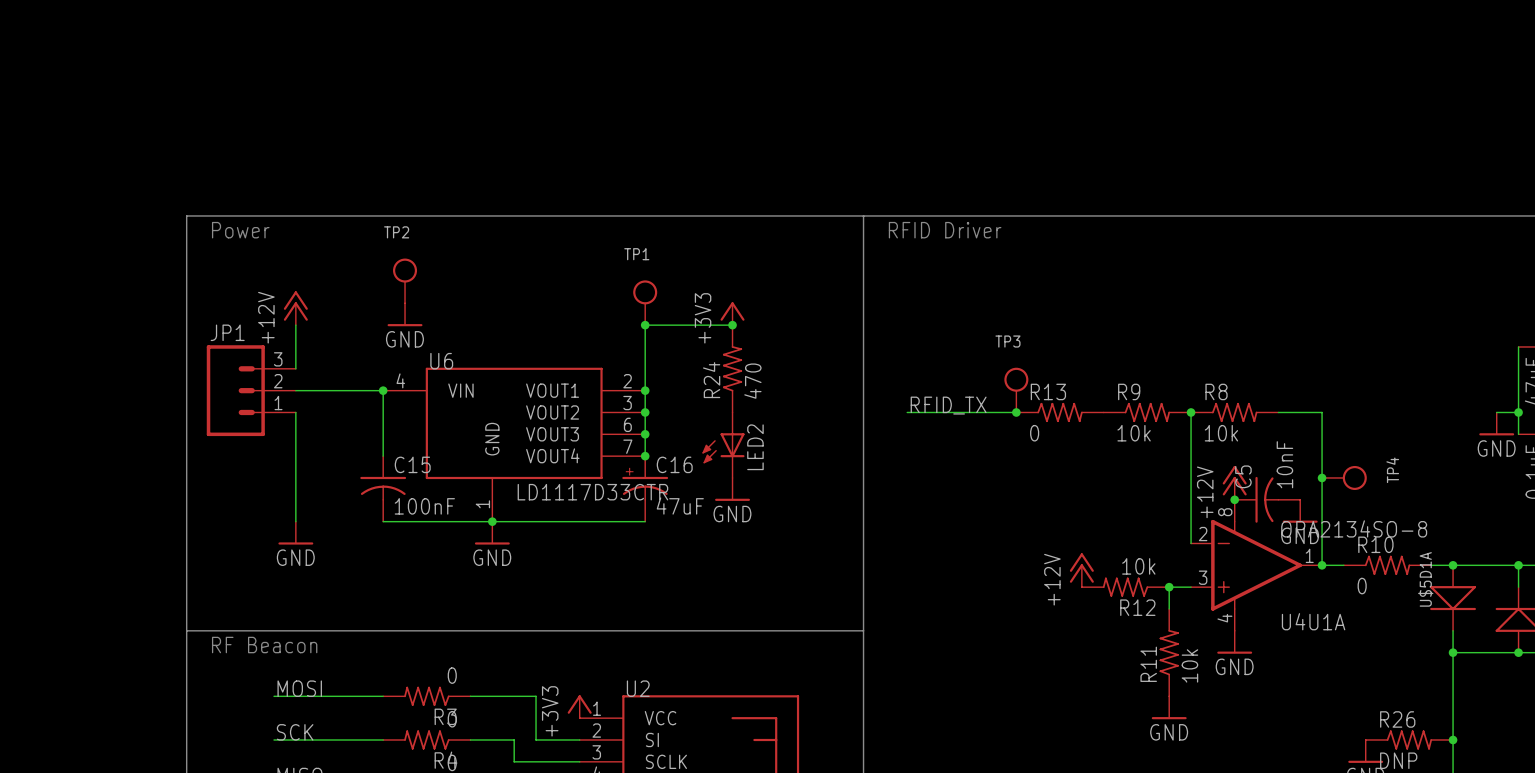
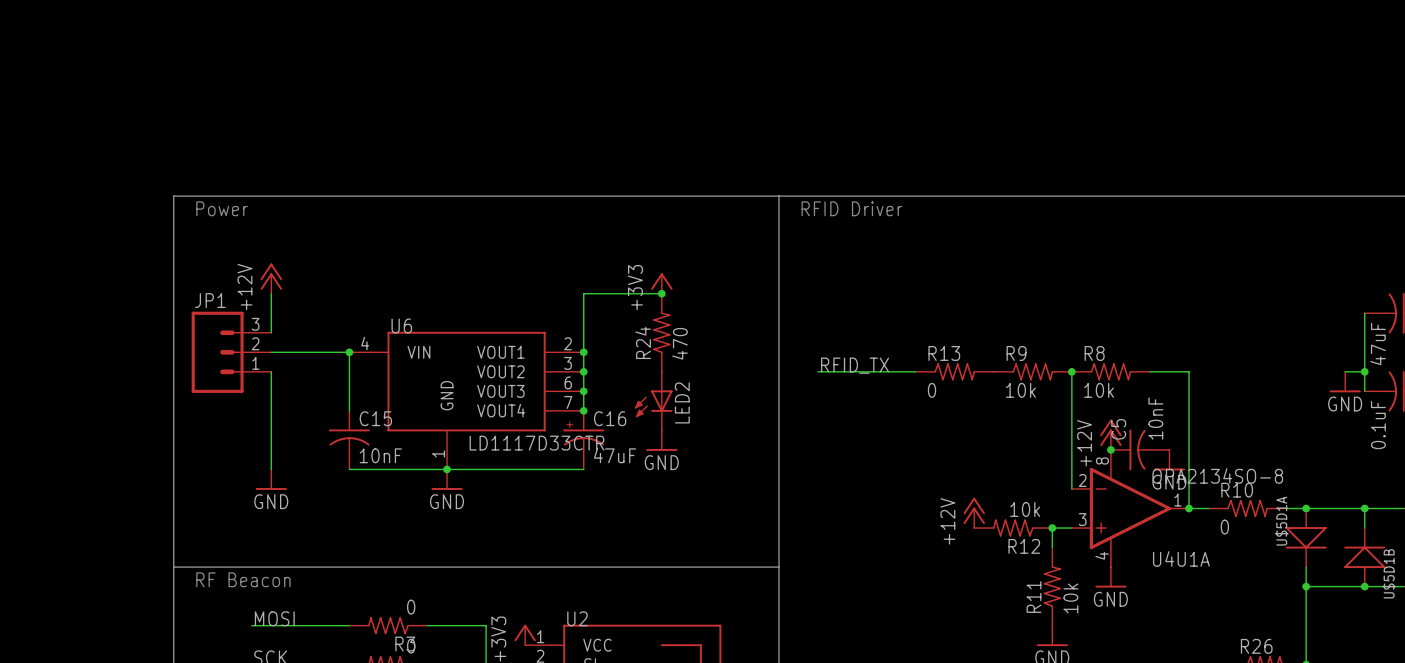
TP2: (405, 280) -> none
TP1: (645, 302) -> none
power symbol: GND (405, 314) -> none
junction: (645, 325) -> none
TP3: (1016, 390) -> none
junction: (1016, 412) -> none
junction: (1322, 477) -> none
TP4: (1344, 477) -> none
C15 value: 100nF (424, 506) -> 10nF (380, 455)

